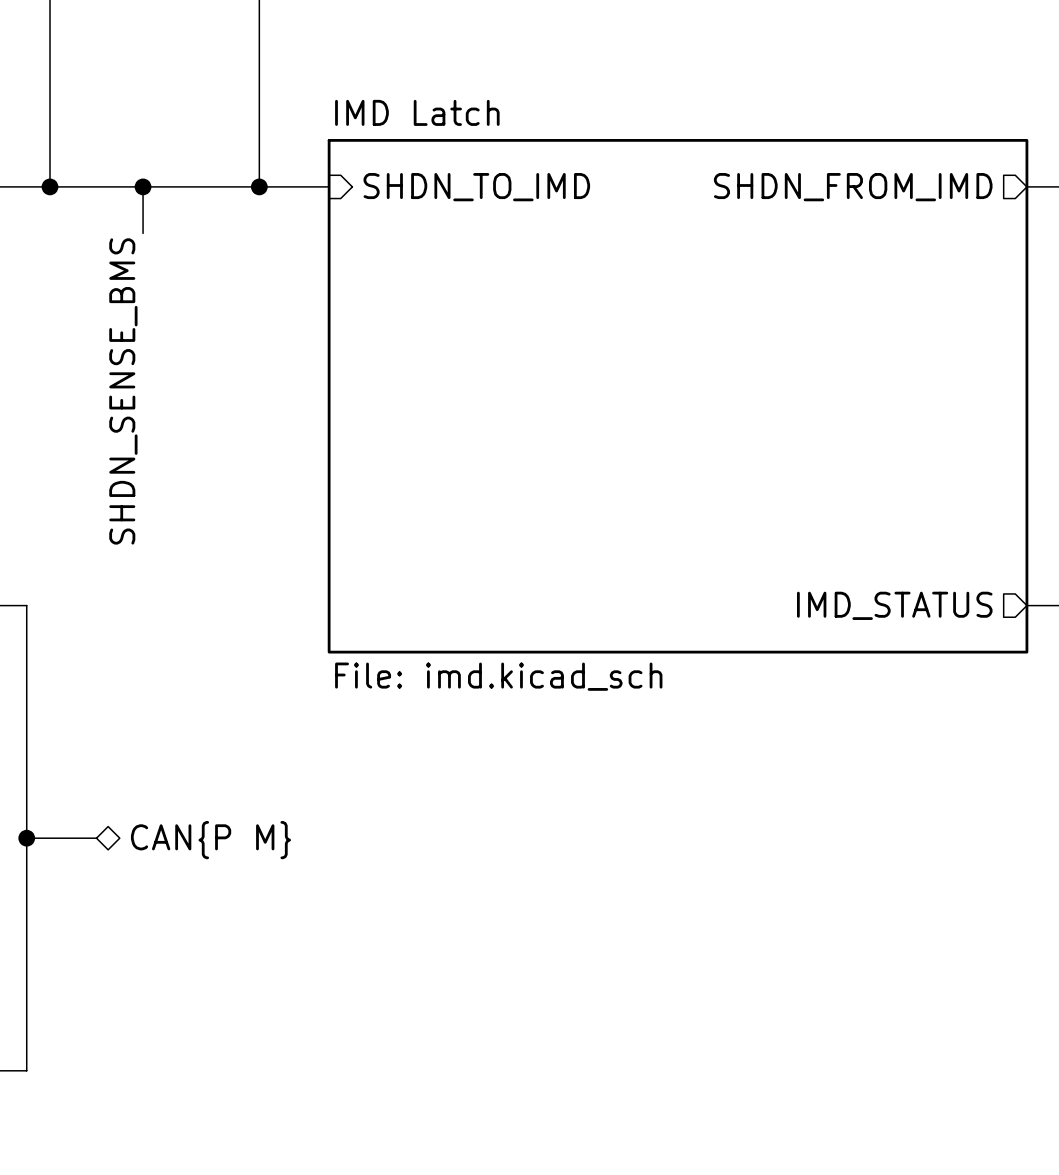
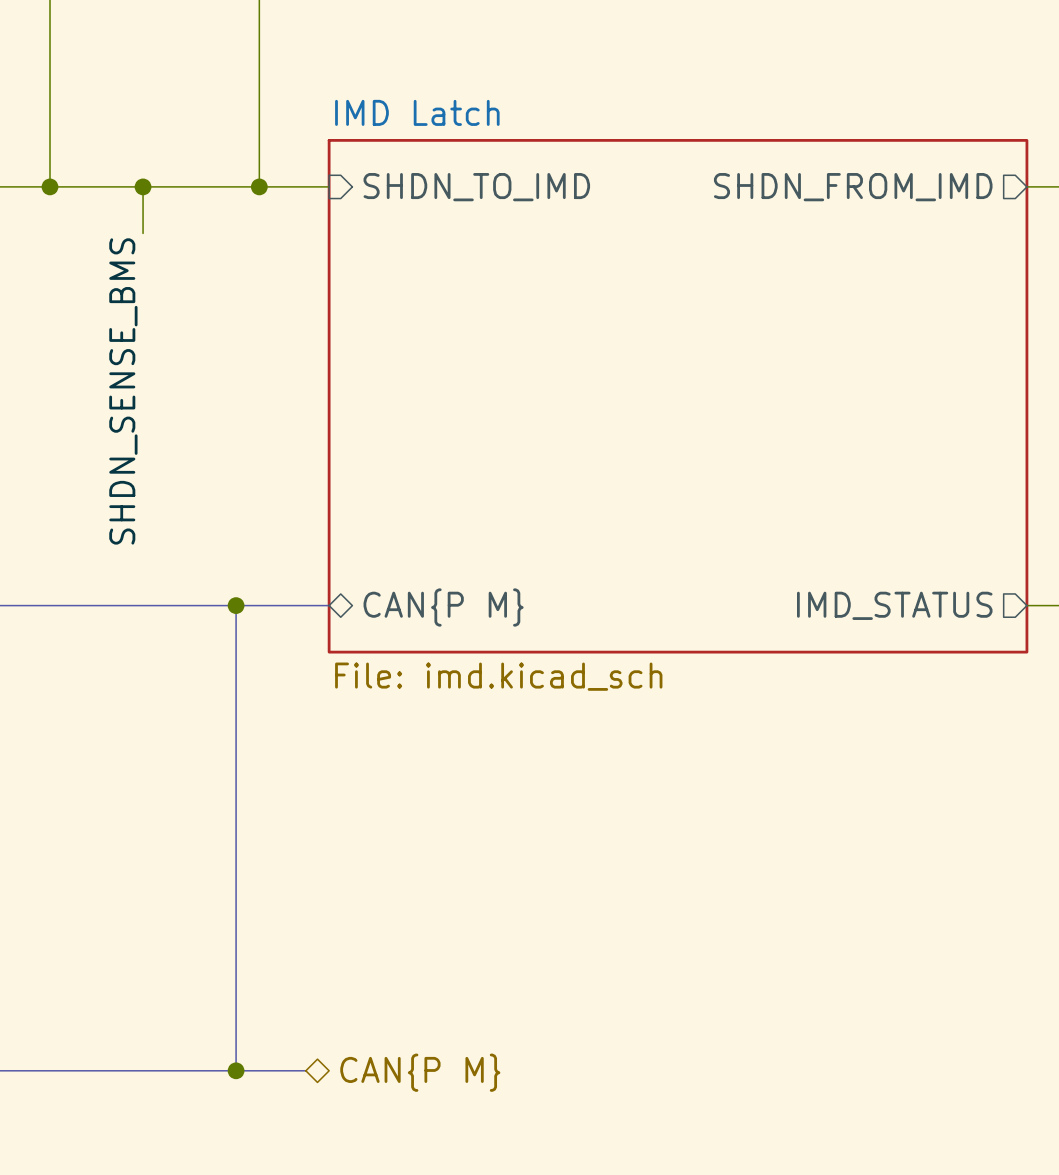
bus: (26, 605) (26, 1070) -> (305, 1070) (26, 1070)
bus: none -> (26, 605) (329, 605)
bus: none -> (236, 605) (236, 1070)
junction: none -> (236, 605)
sheet pin: none -> CAN{P M} (443, 607)
bus: (26, 838) (96, 838) -> none
junction: (26, 838) -> none
hierarchical label position: CAN{P M} (210, 840) -> CAN{P M} (420, 1072)
junction: none -> (236, 1070)

